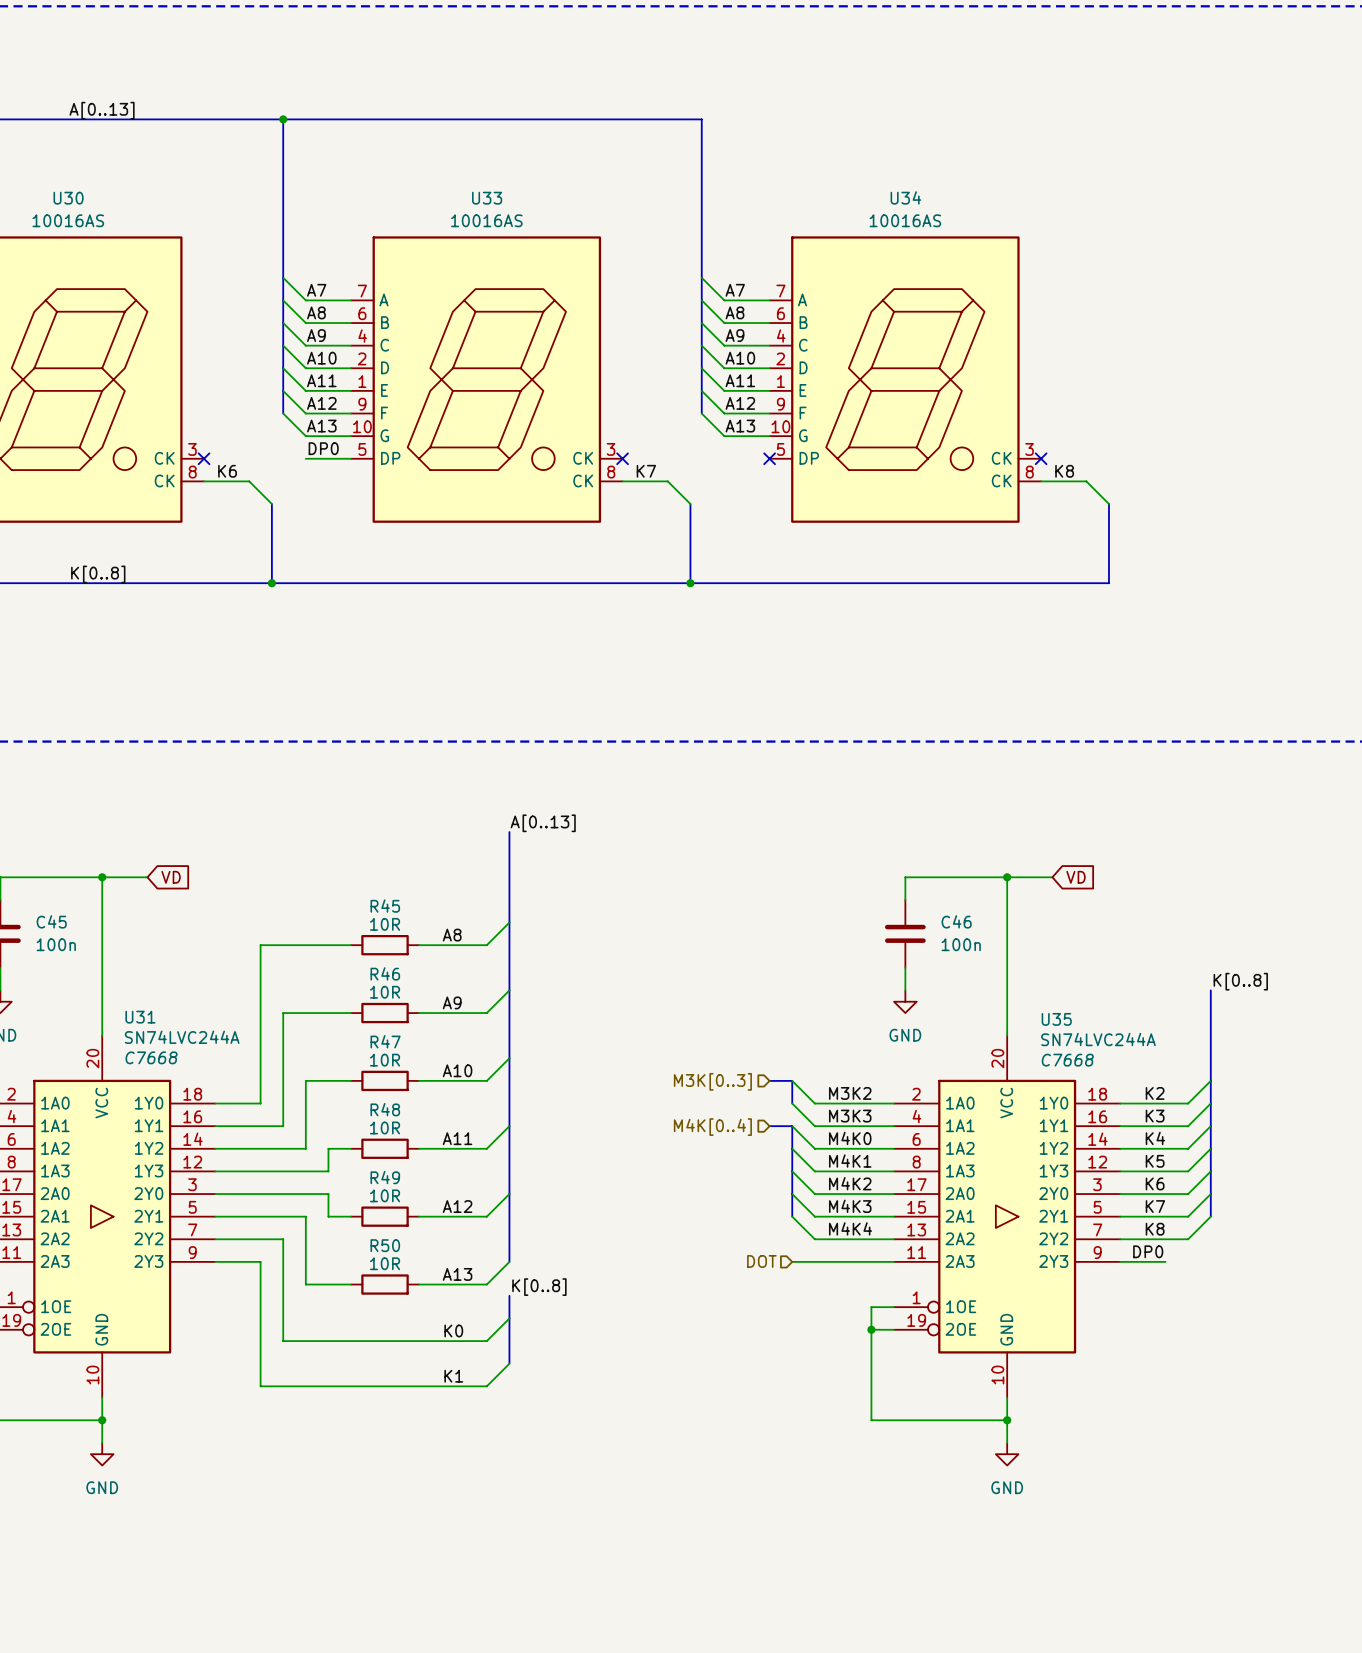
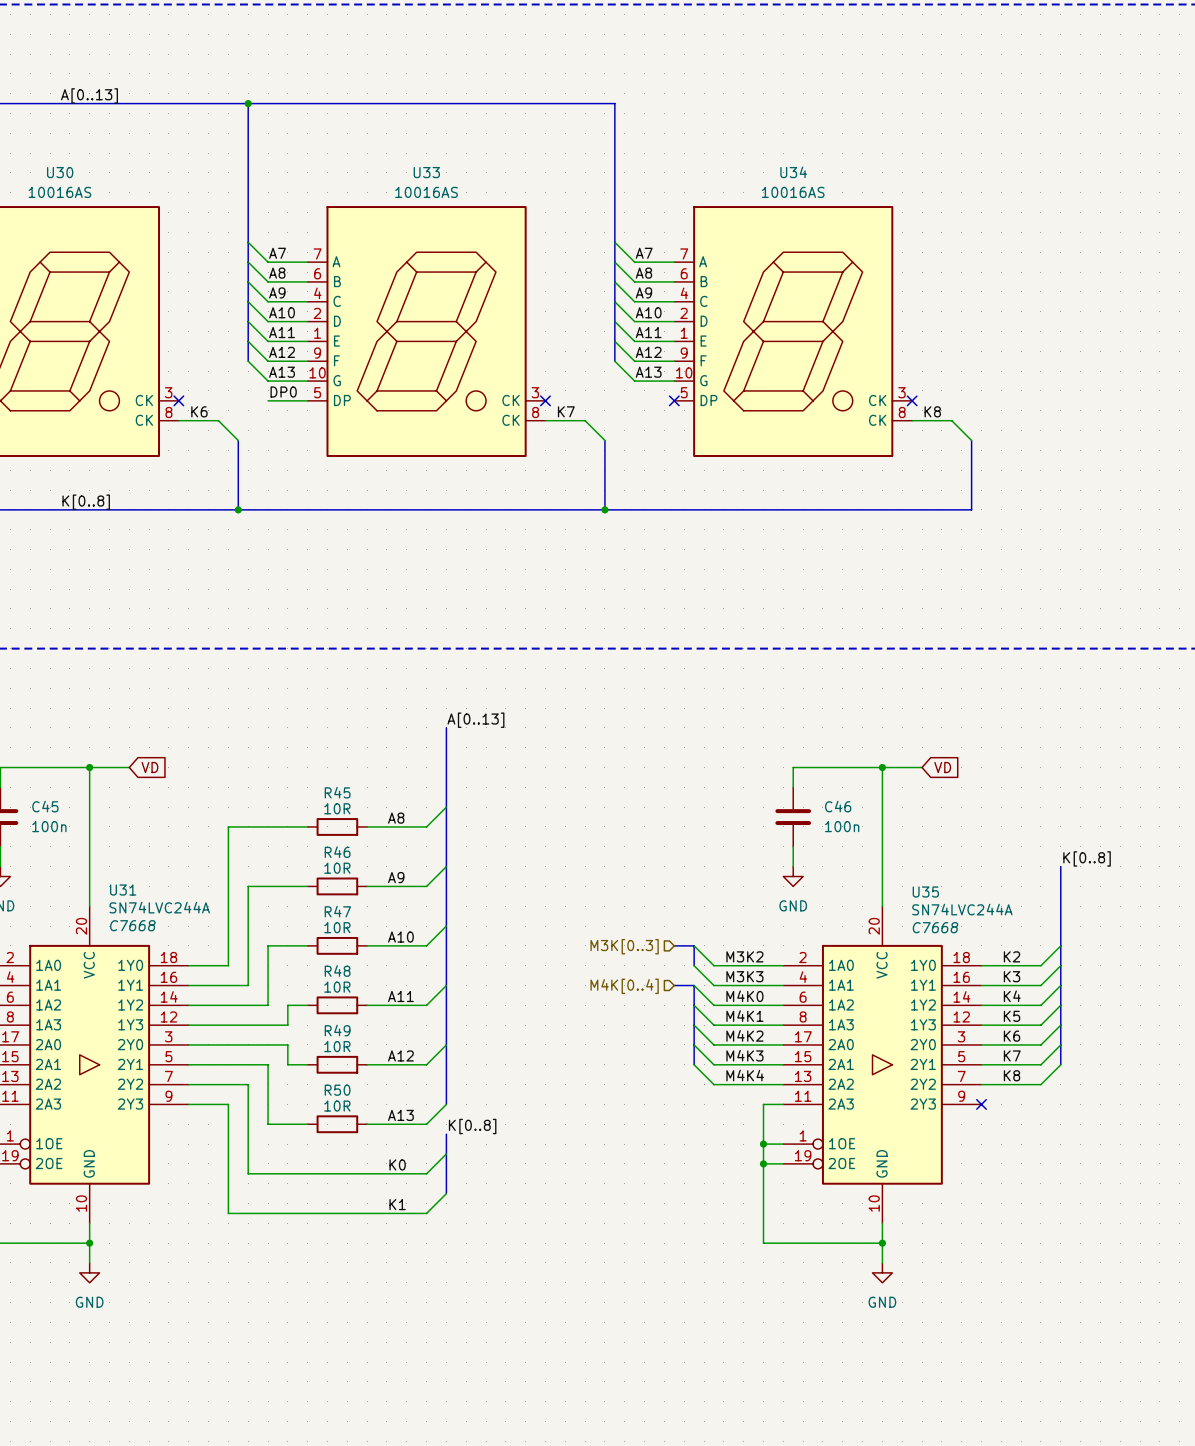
label: DP0 (1148, 1251) -> none
hierarchical label: DOT (761, 1261) -> none
wire: (792, 1261) (871, 1261) -> (763, 1144) (763, 1104)
wire: (1120, 1261) (1165, 1261) -> none
no-connect mark: none -> (981, 1104)
junction: none -> (763, 1144)

